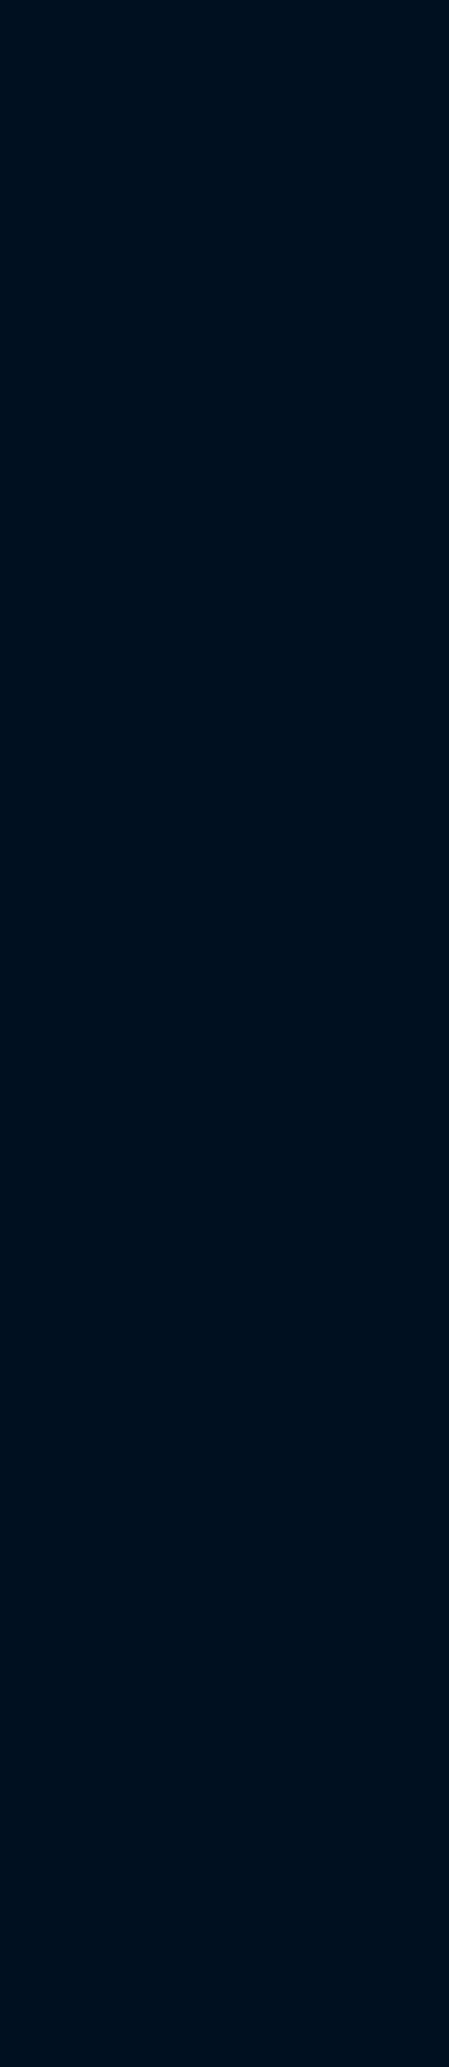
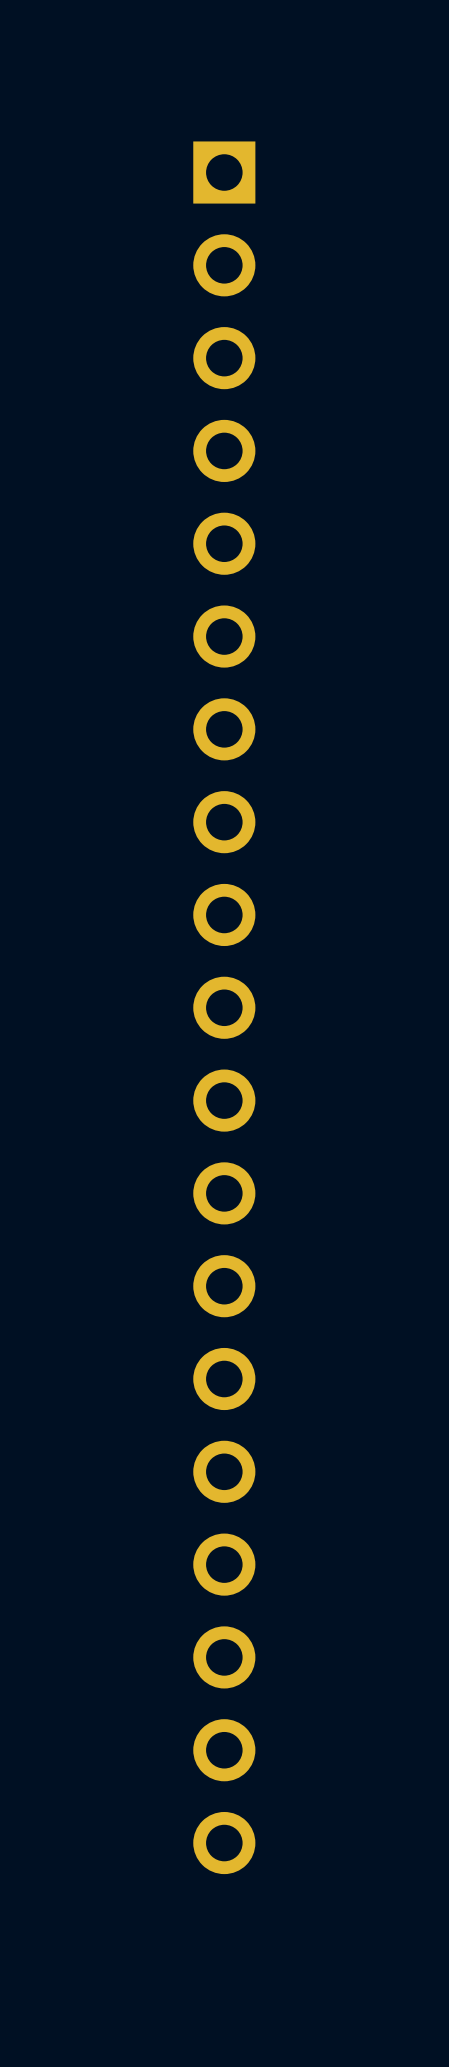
part: none -> (224, 1007)

